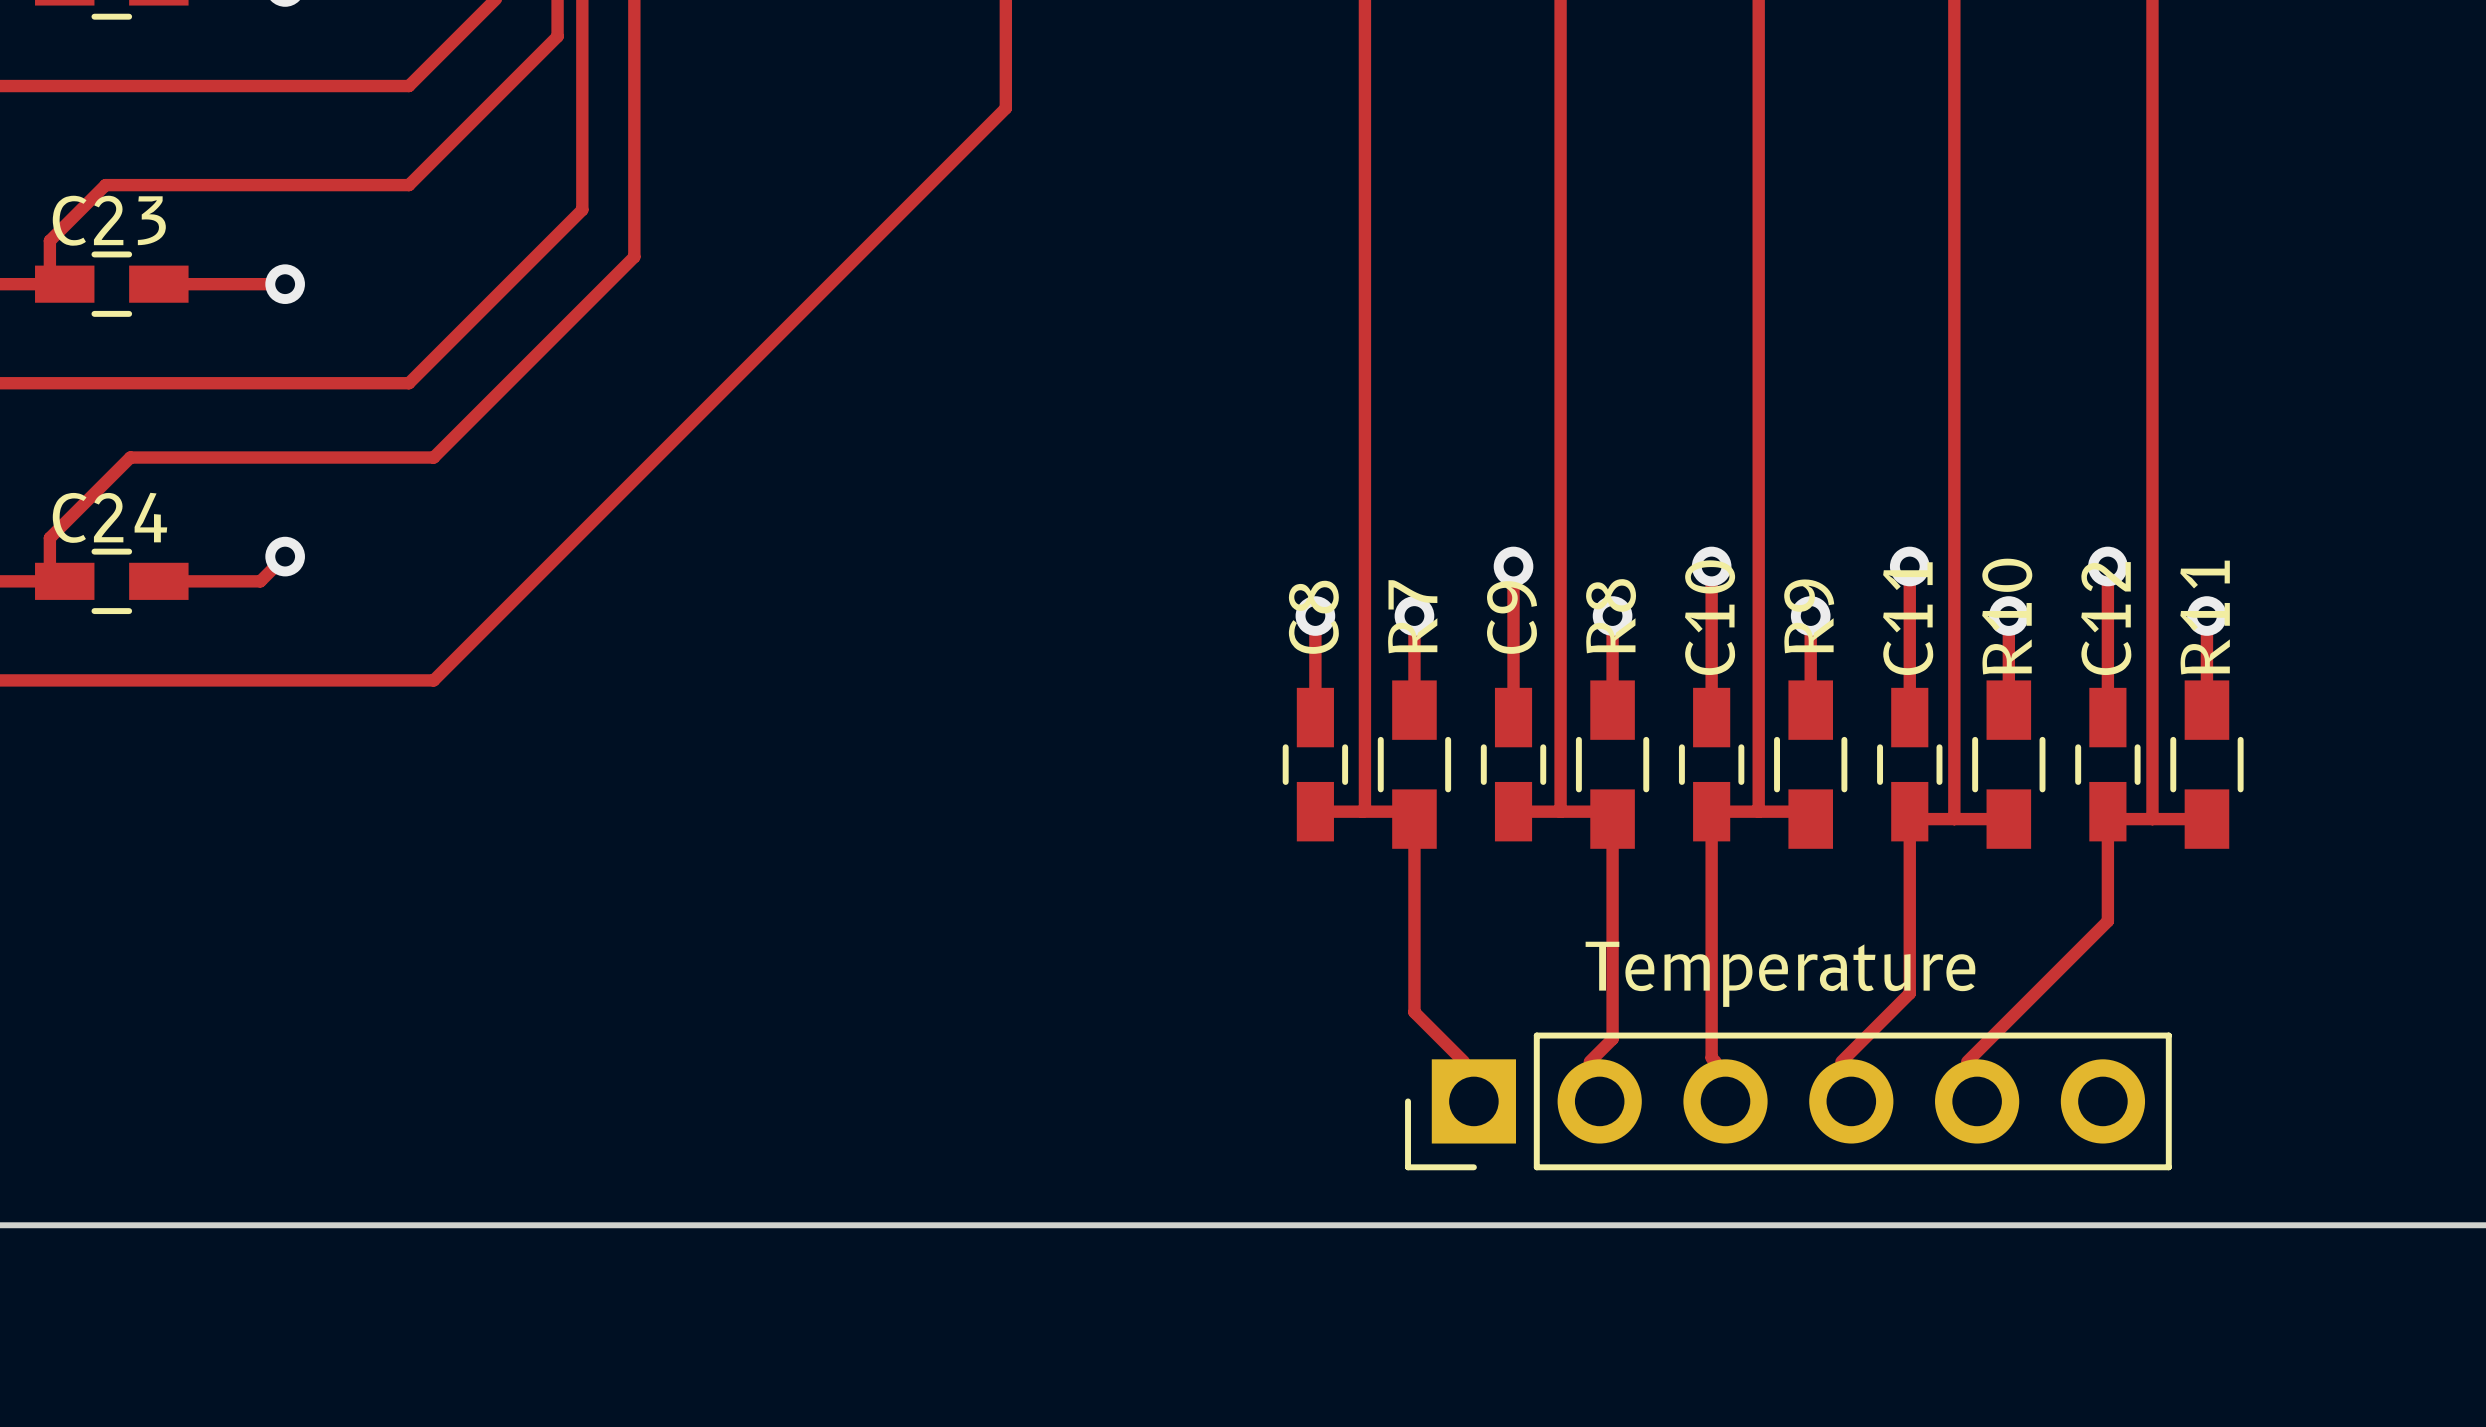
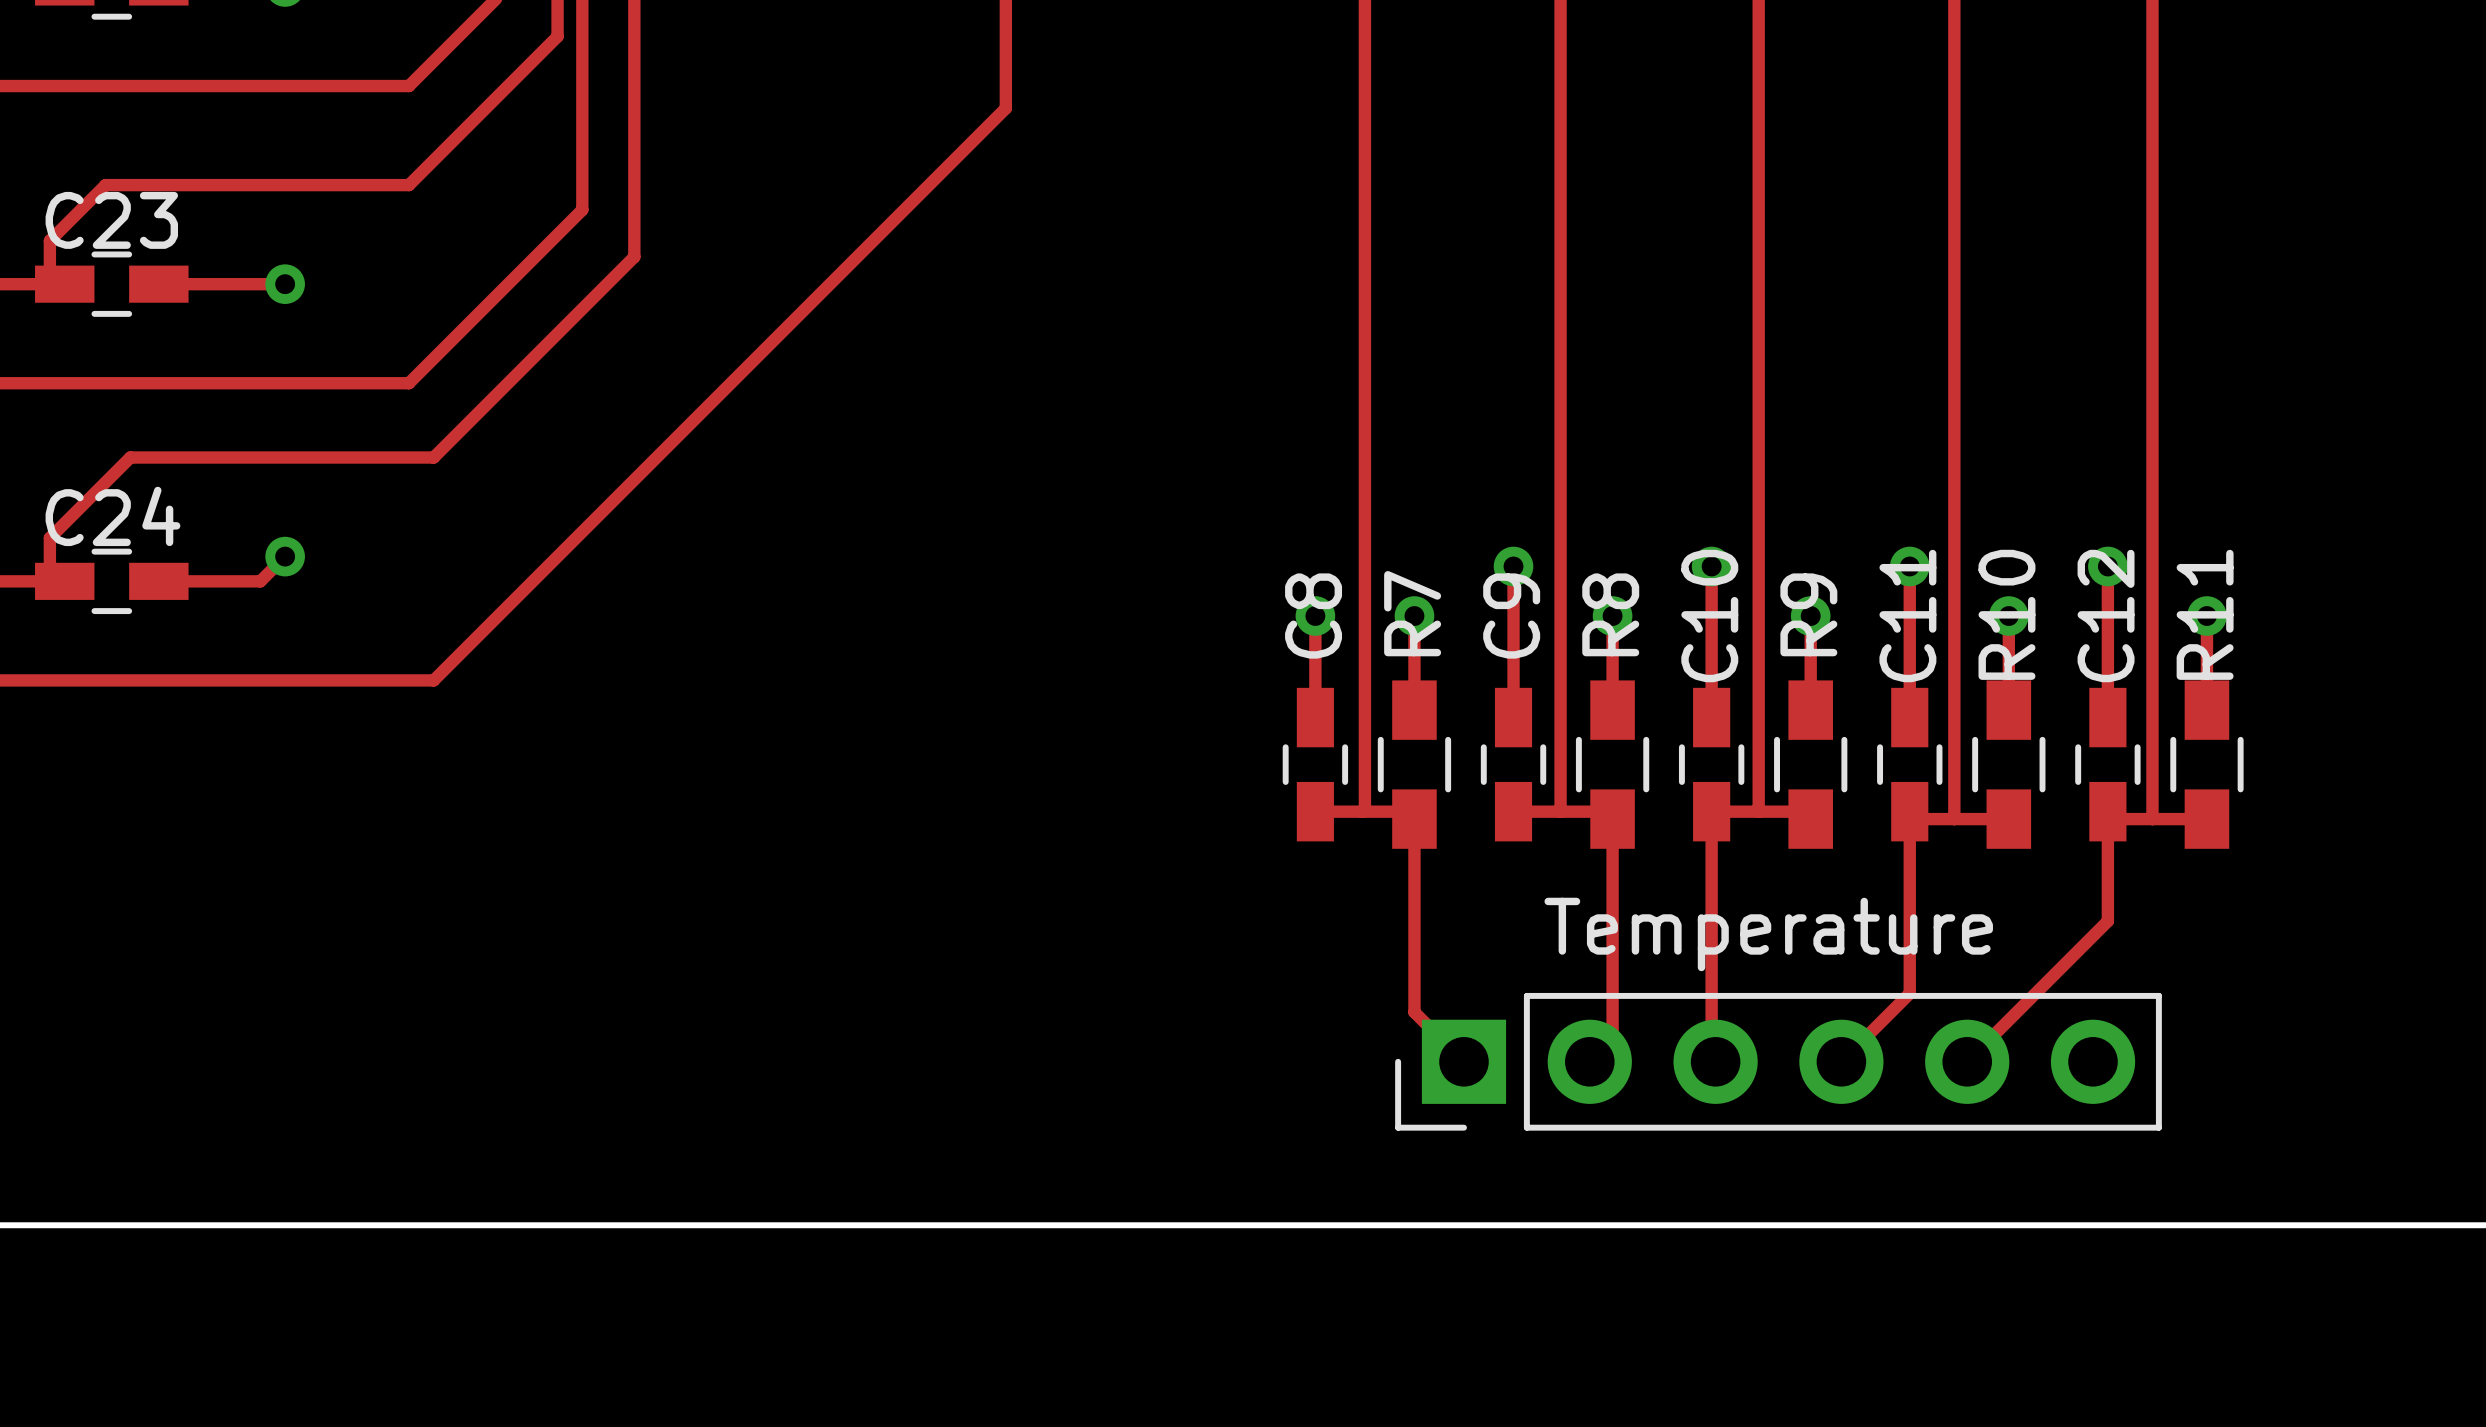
part position: (1788, 1101) -> (1778, 1061)

